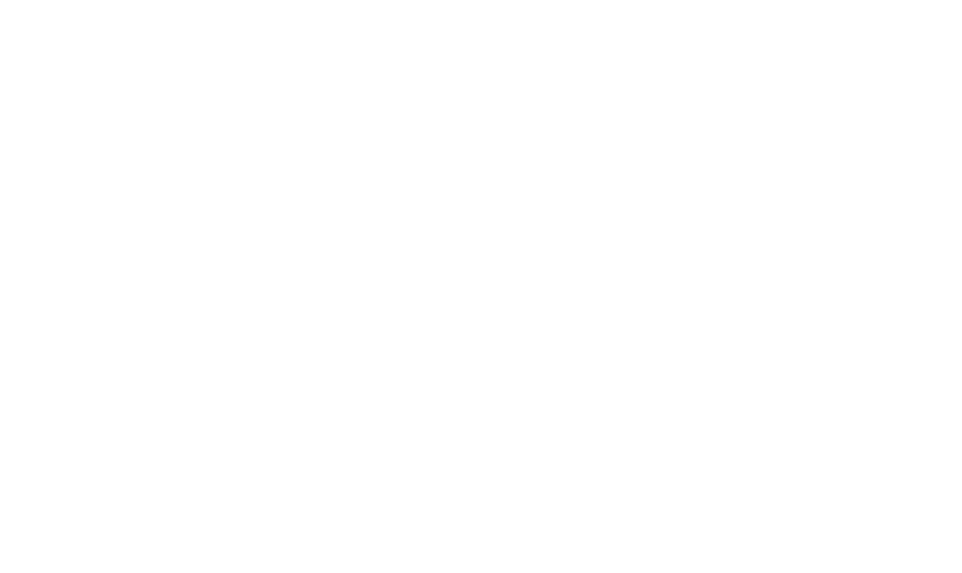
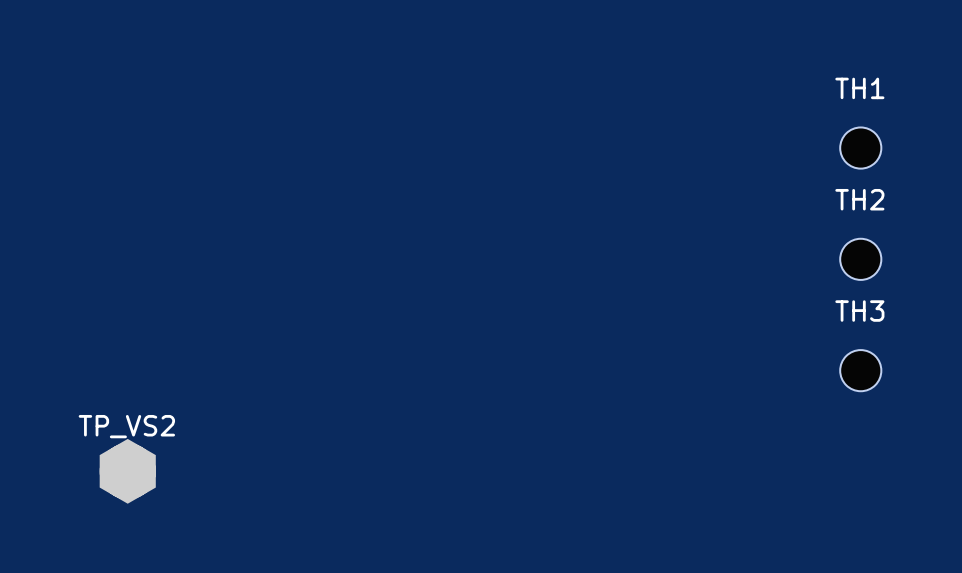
TH1: none -> (860, 148)
TH2: none -> (860, 259)
TH3: none -> (860, 370)
TP_VS2: none -> (127, 471)

